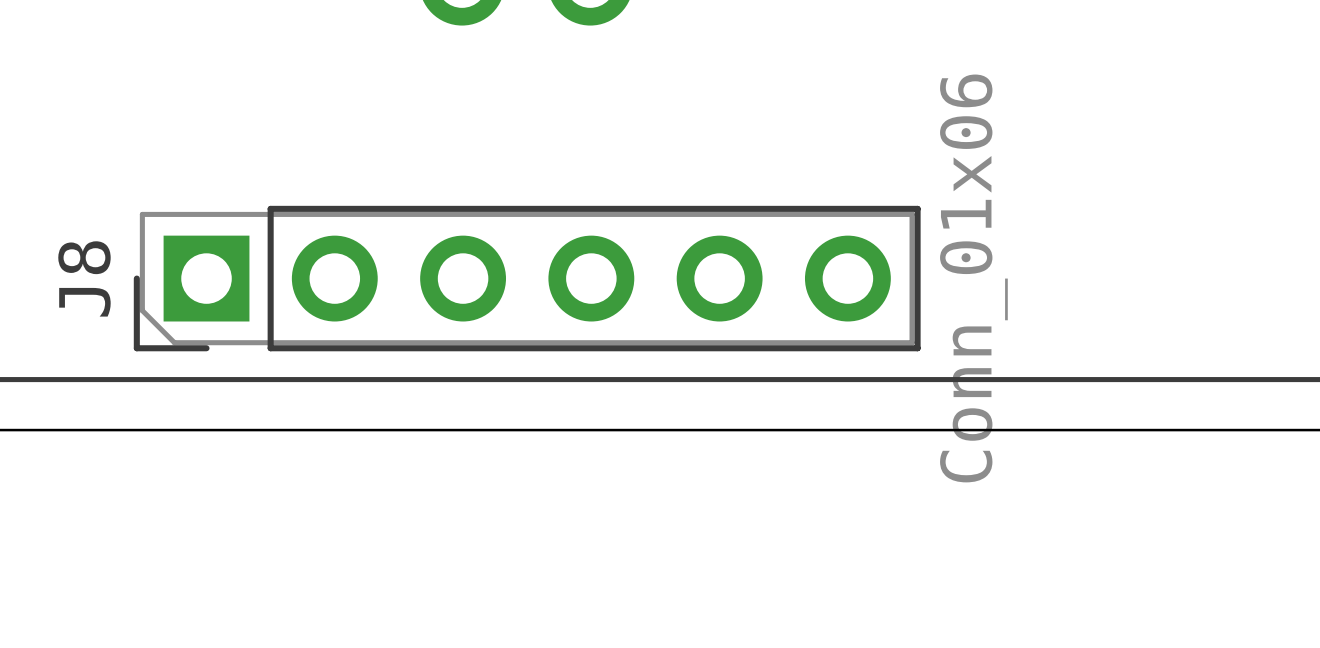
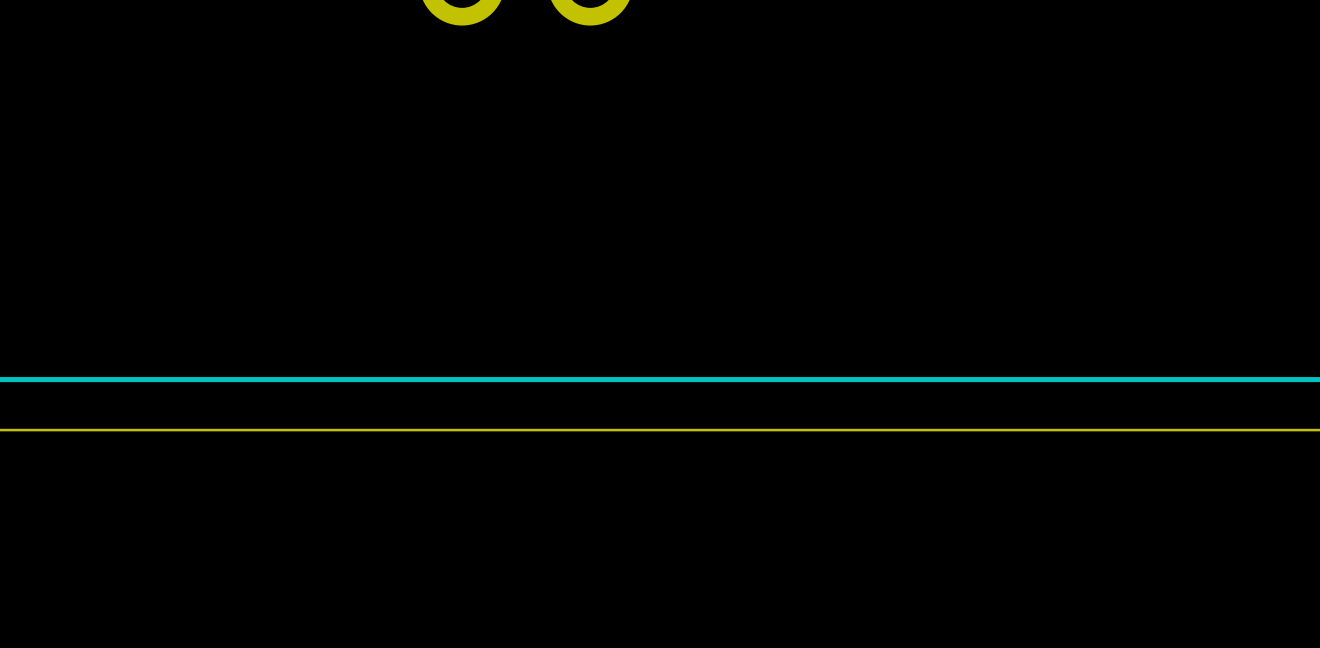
J8: Conn_01x06 (527, 278) -> none

